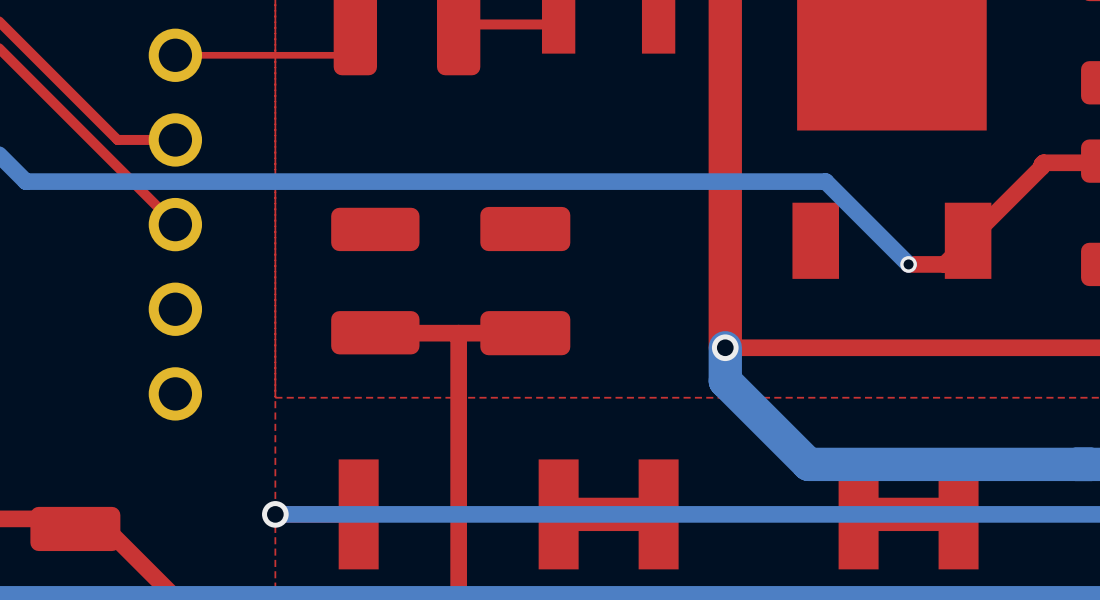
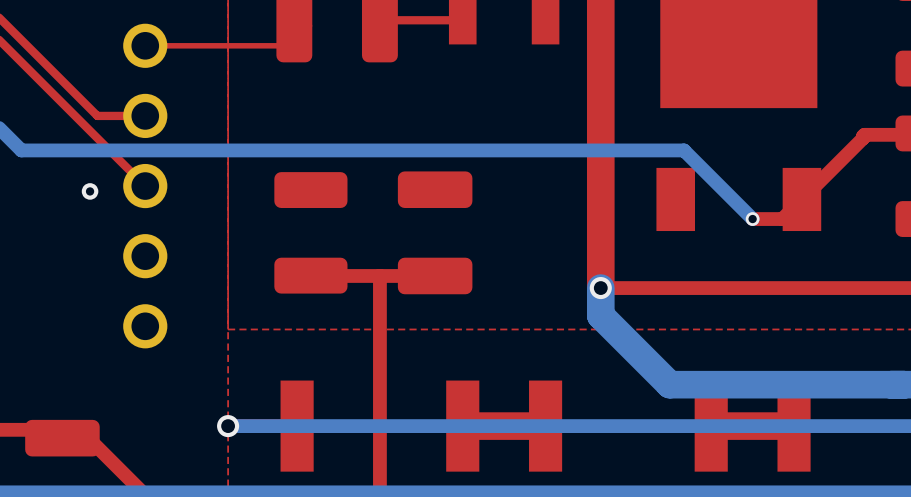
via: none -> (90, 191)

